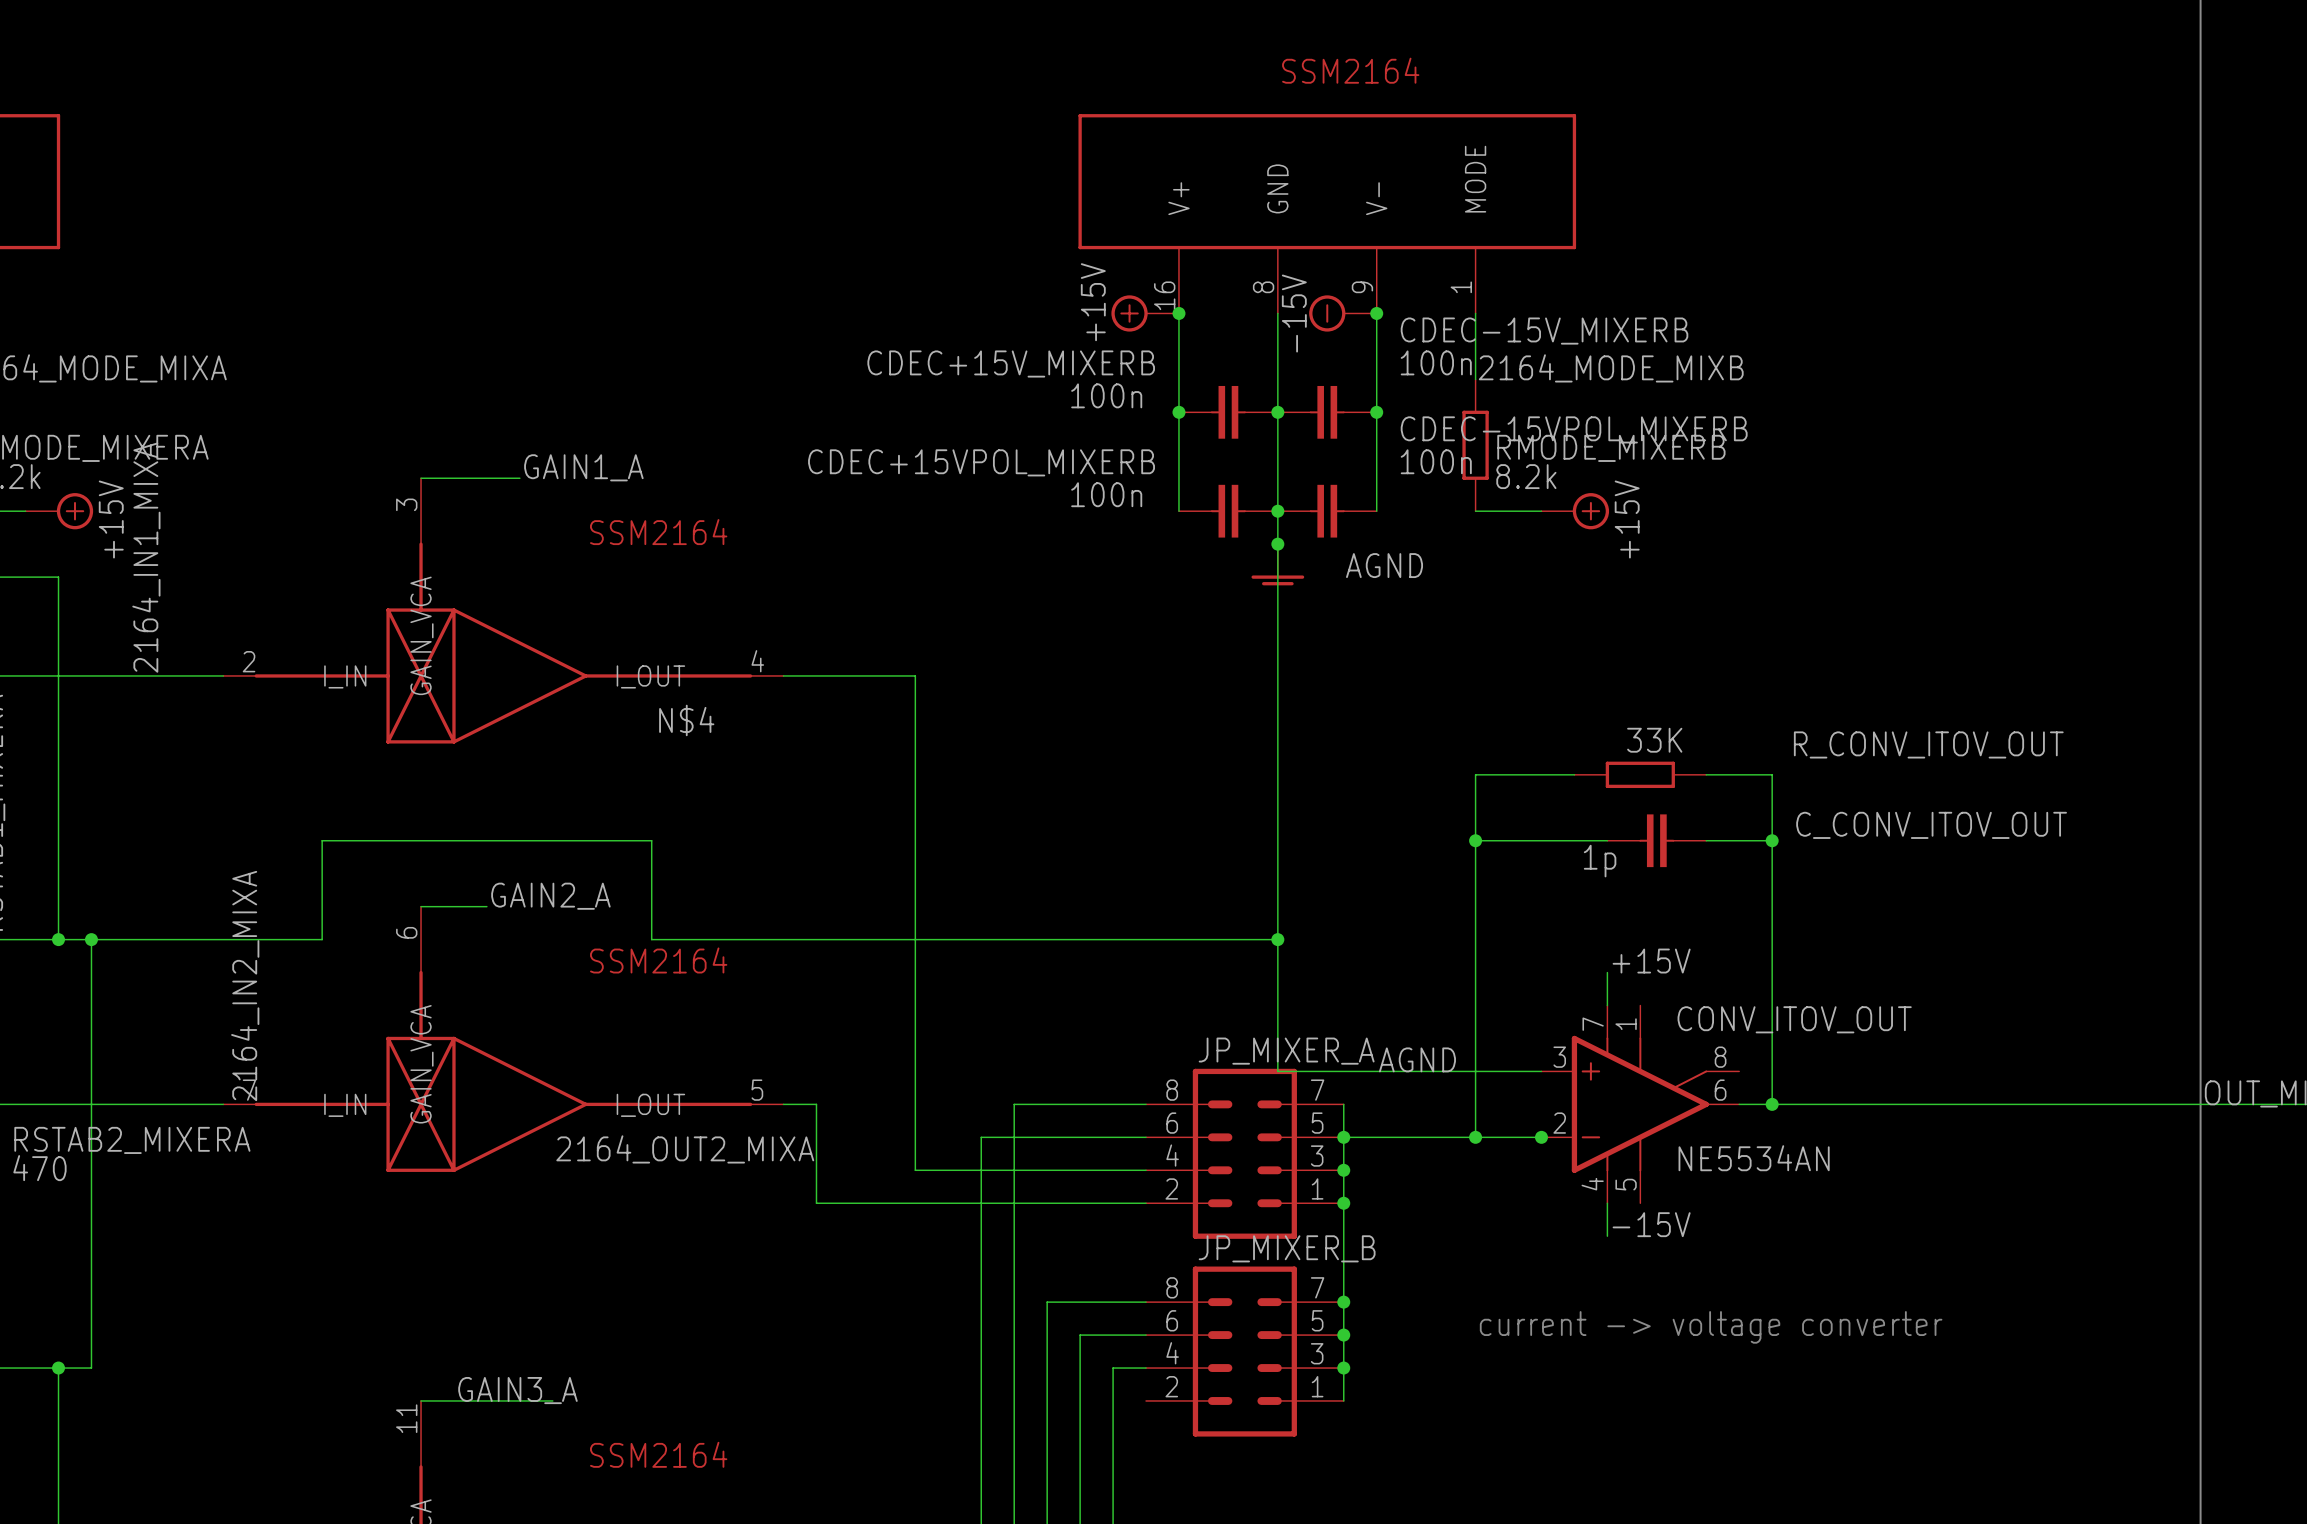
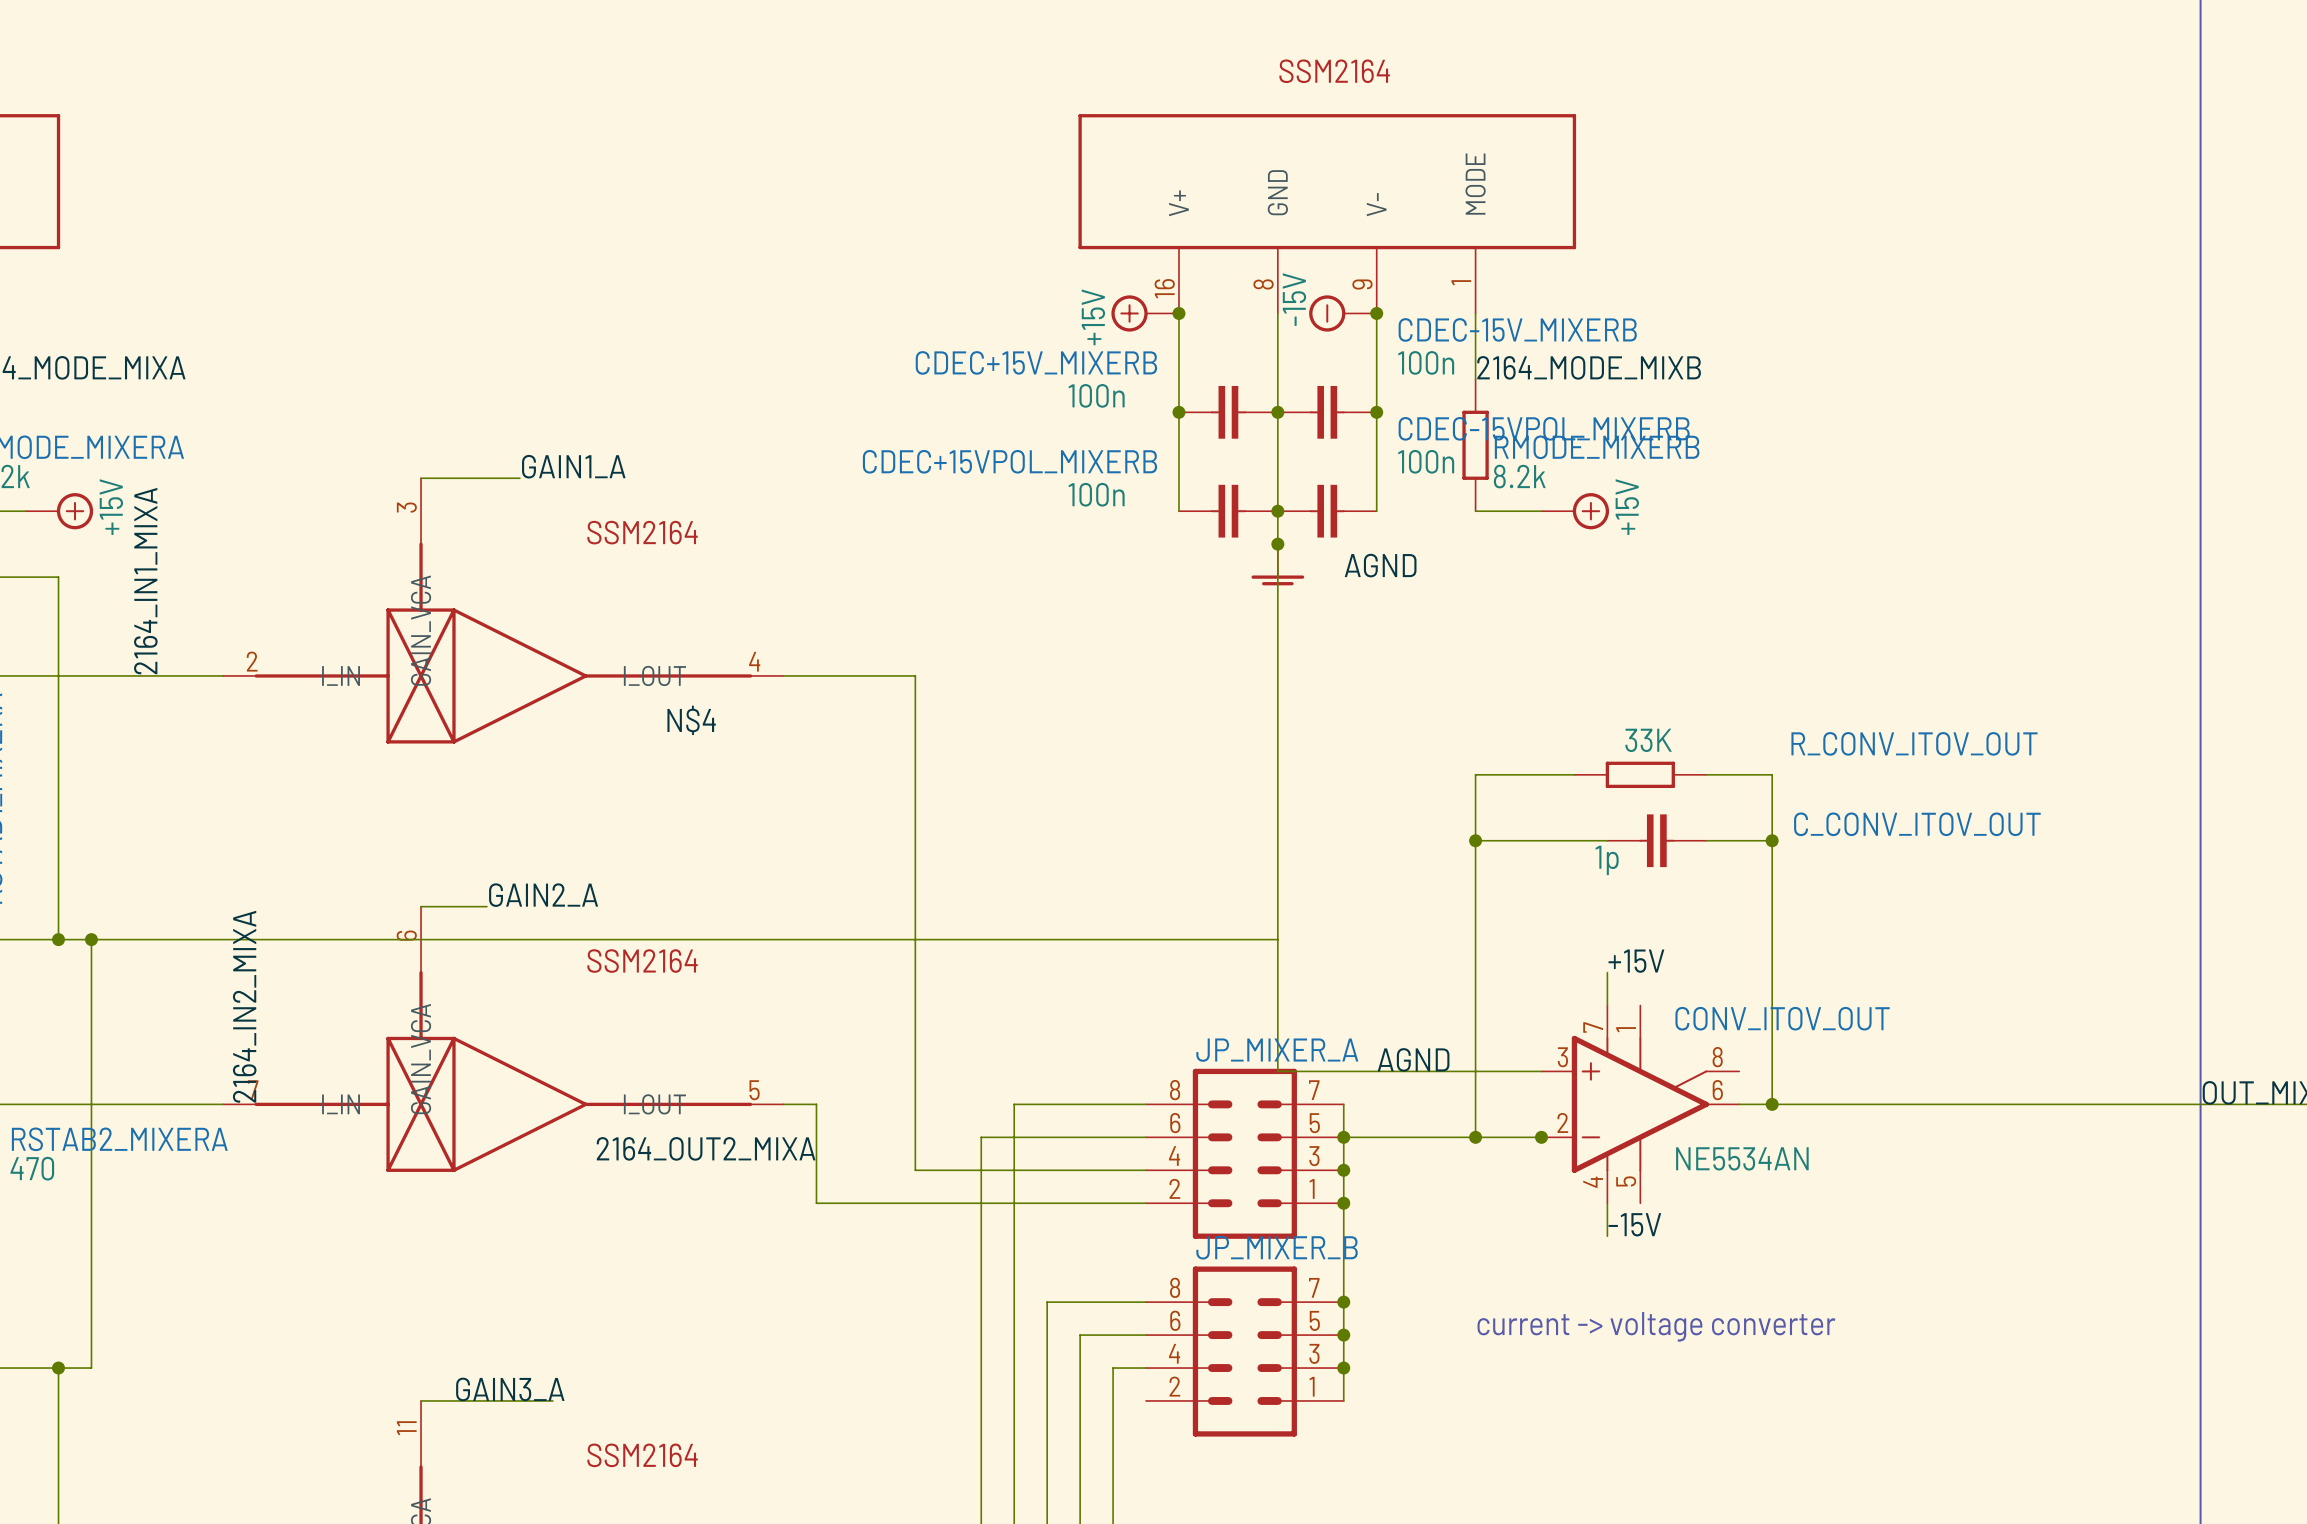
wire: (322, 939) (322, 840) (651, 840) (651, 939) -> (322, 939) (651, 939)
junction: (1277, 939) -> none

